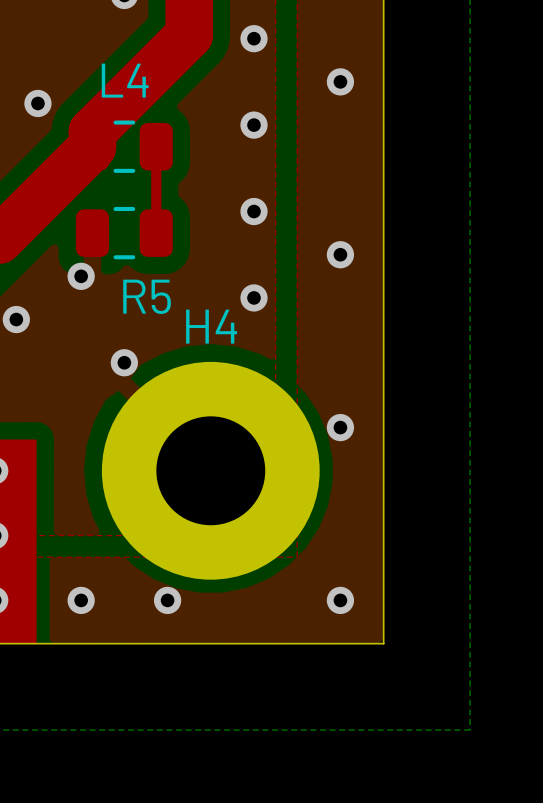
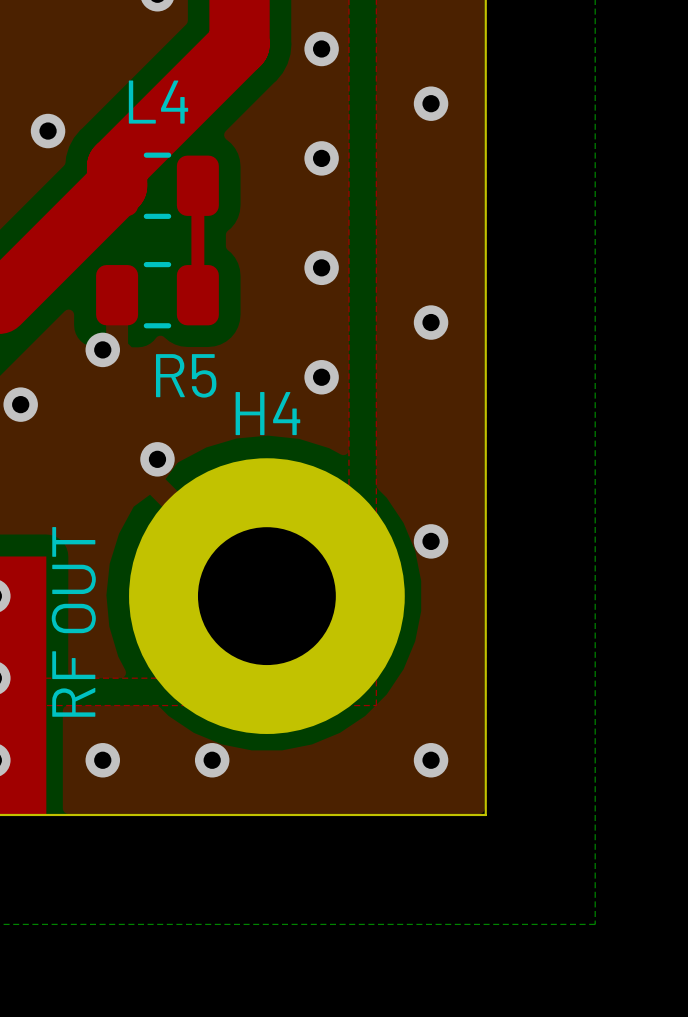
text: none -> RF OUT (73, 621)

